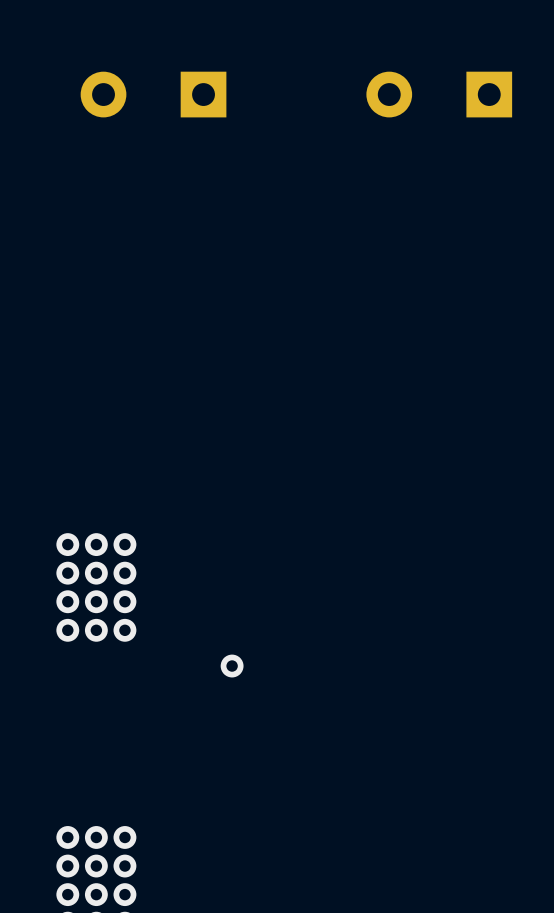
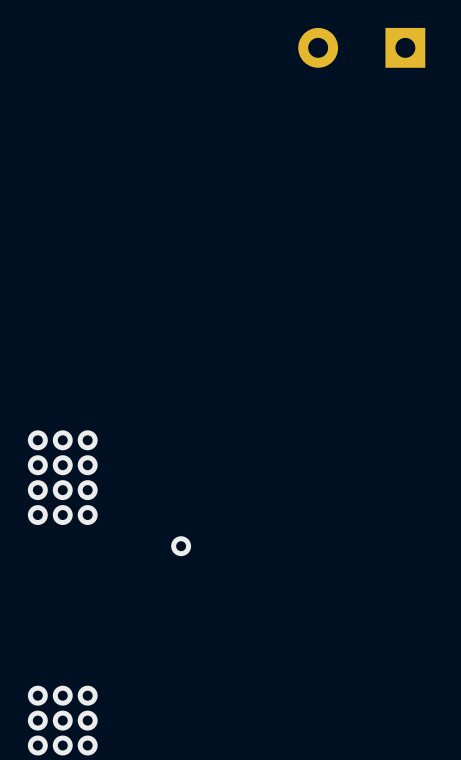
part: (153, 94) -> none

